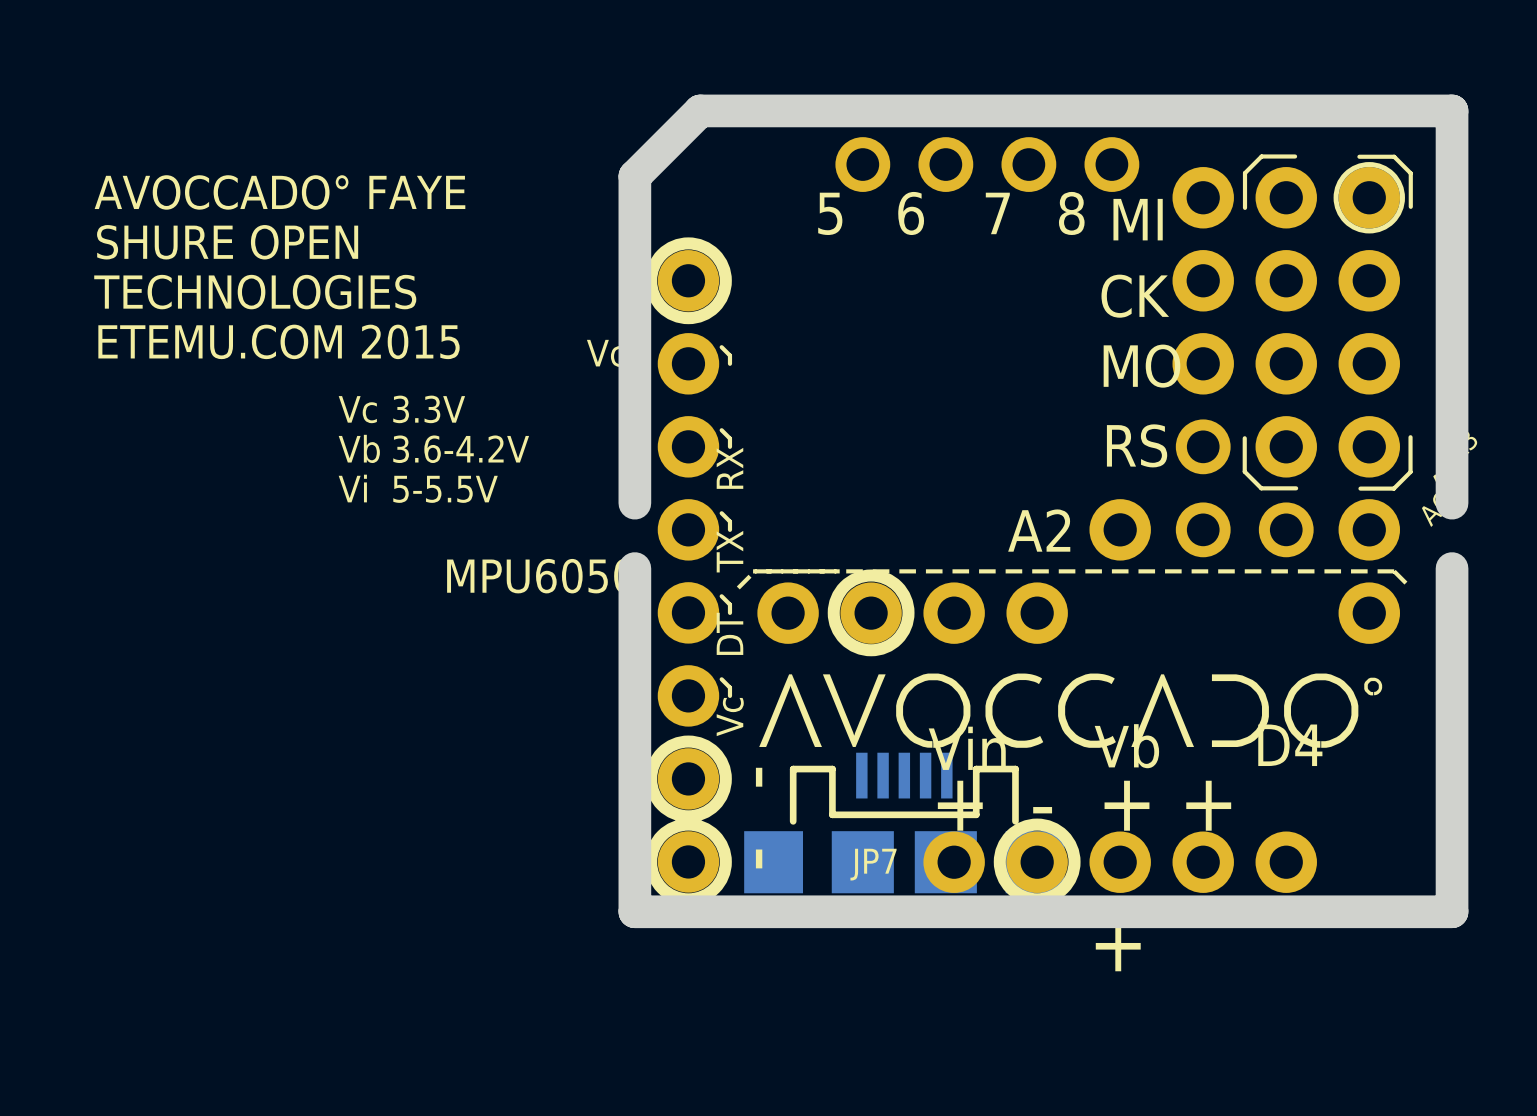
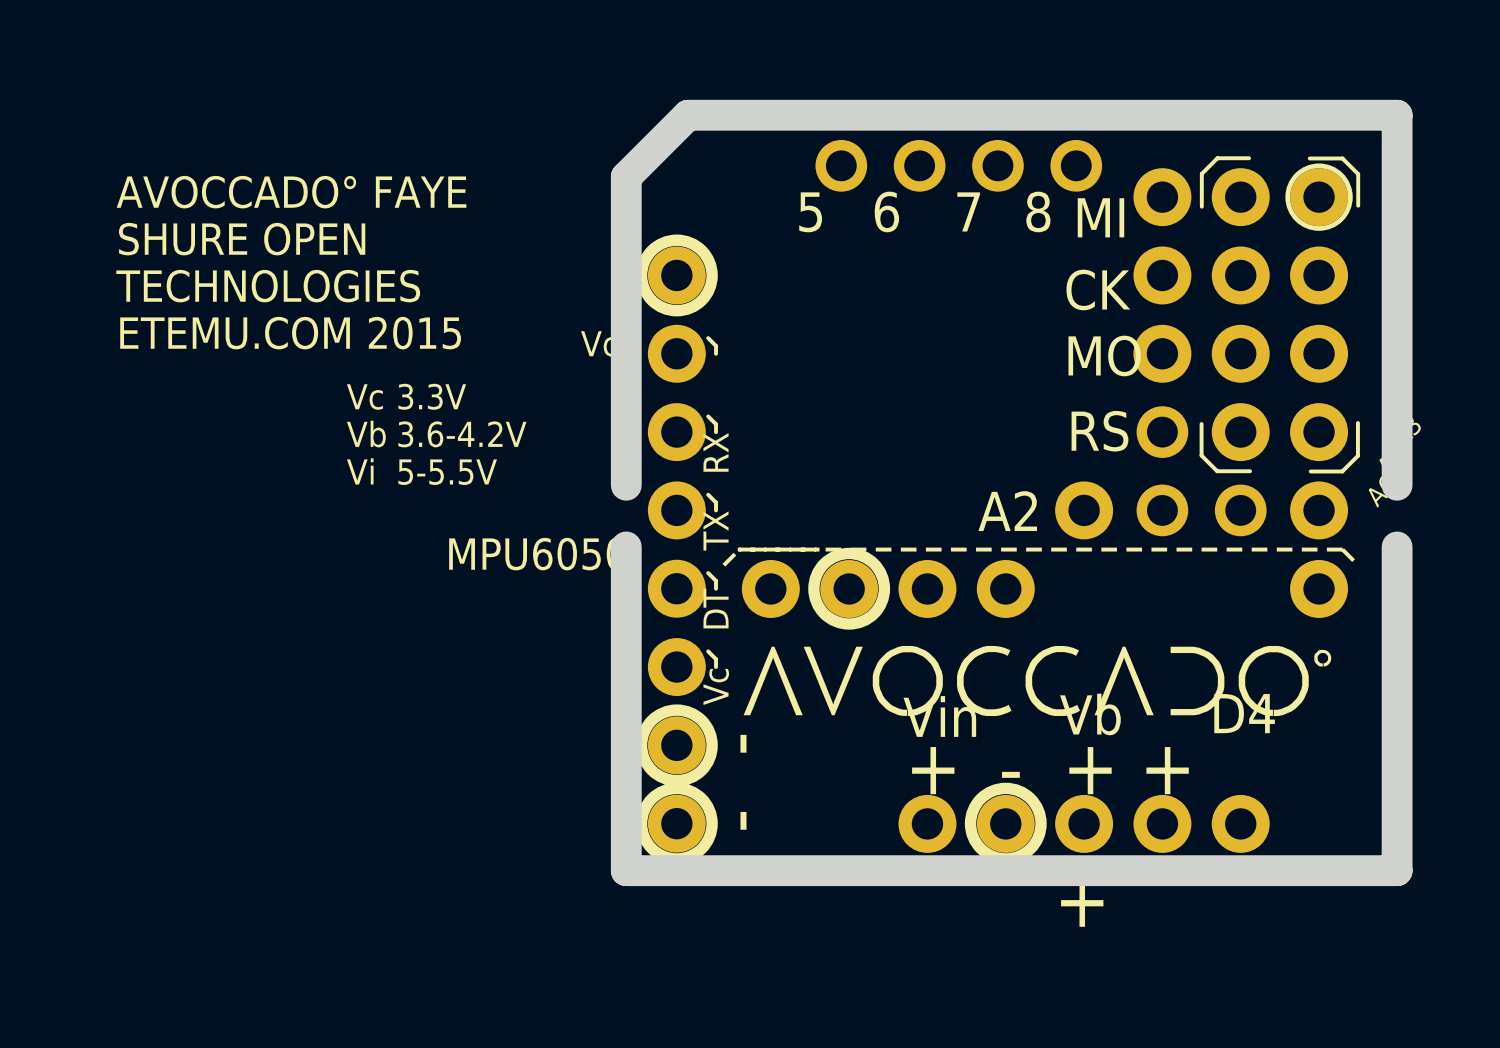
JP7: (904, 832) -> none

